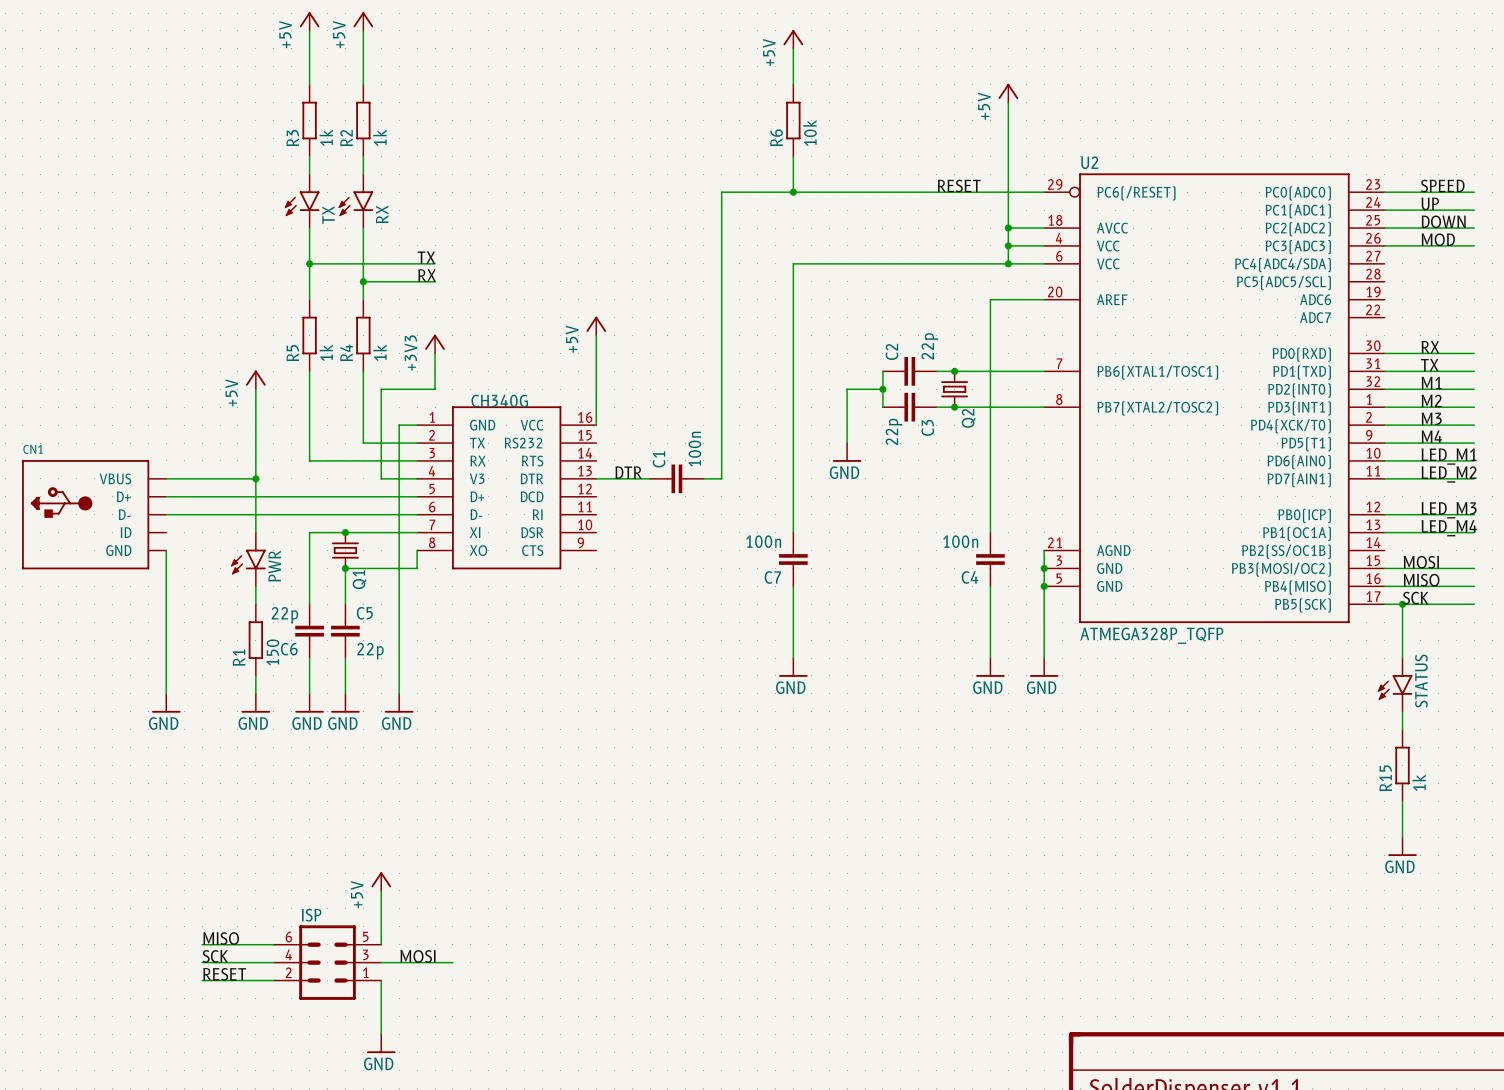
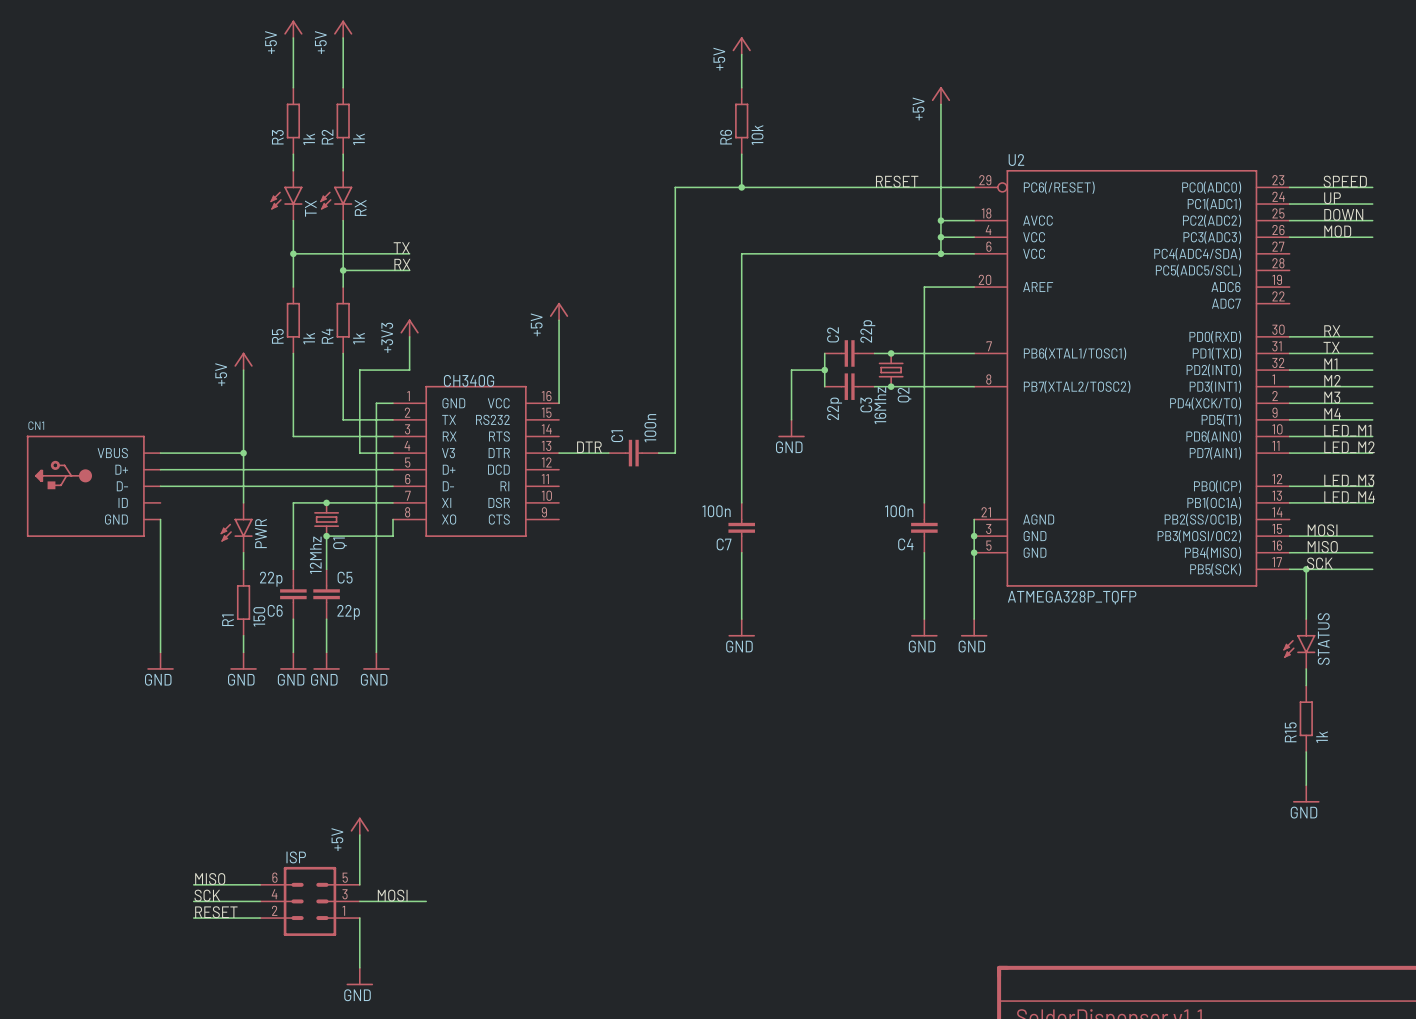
Q2 value: none -> 16Mhz (880, 405)
Q1 value: none -> 12Mhz (315, 555)

